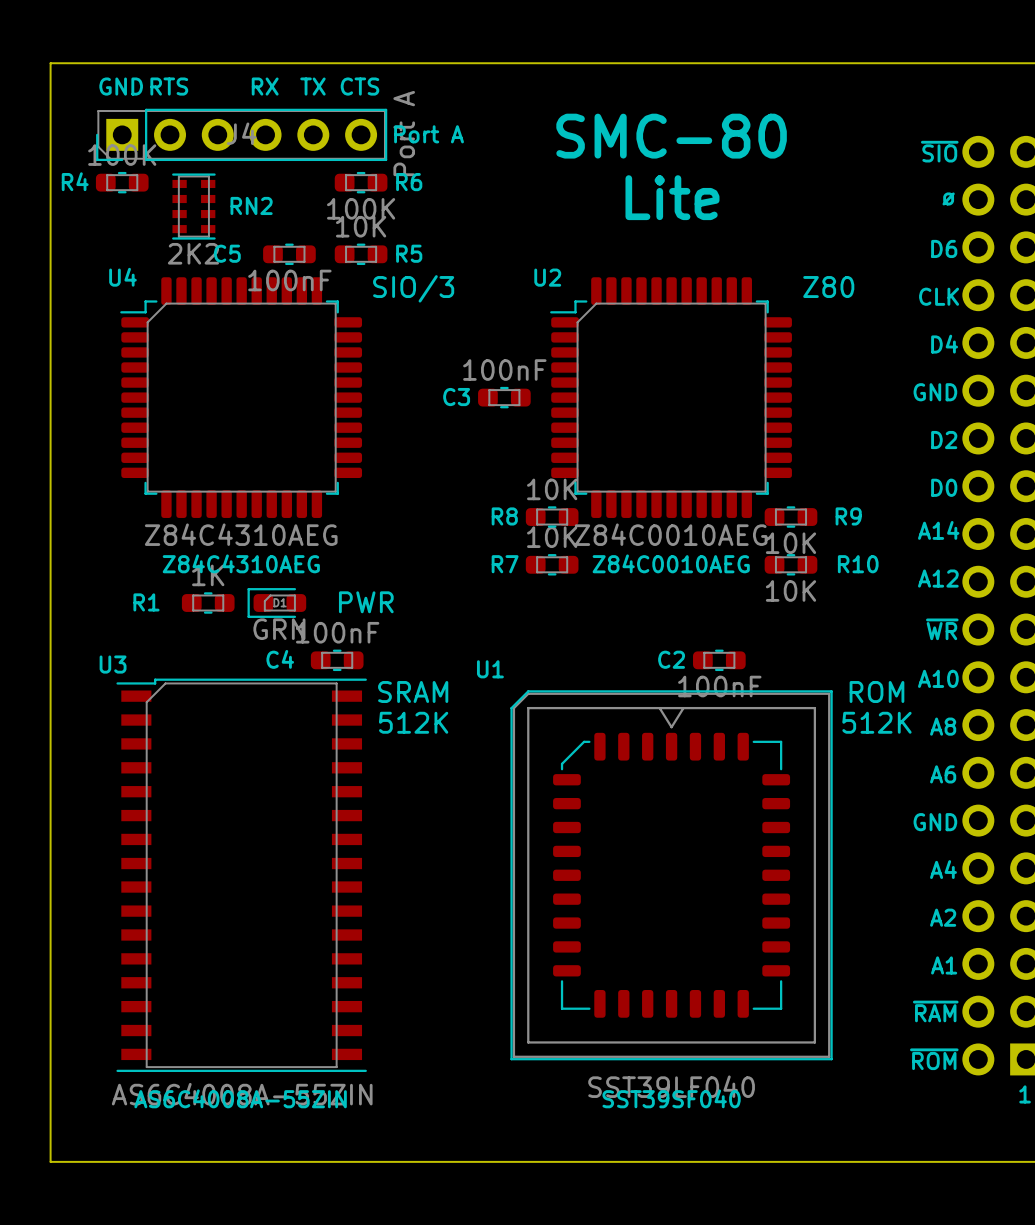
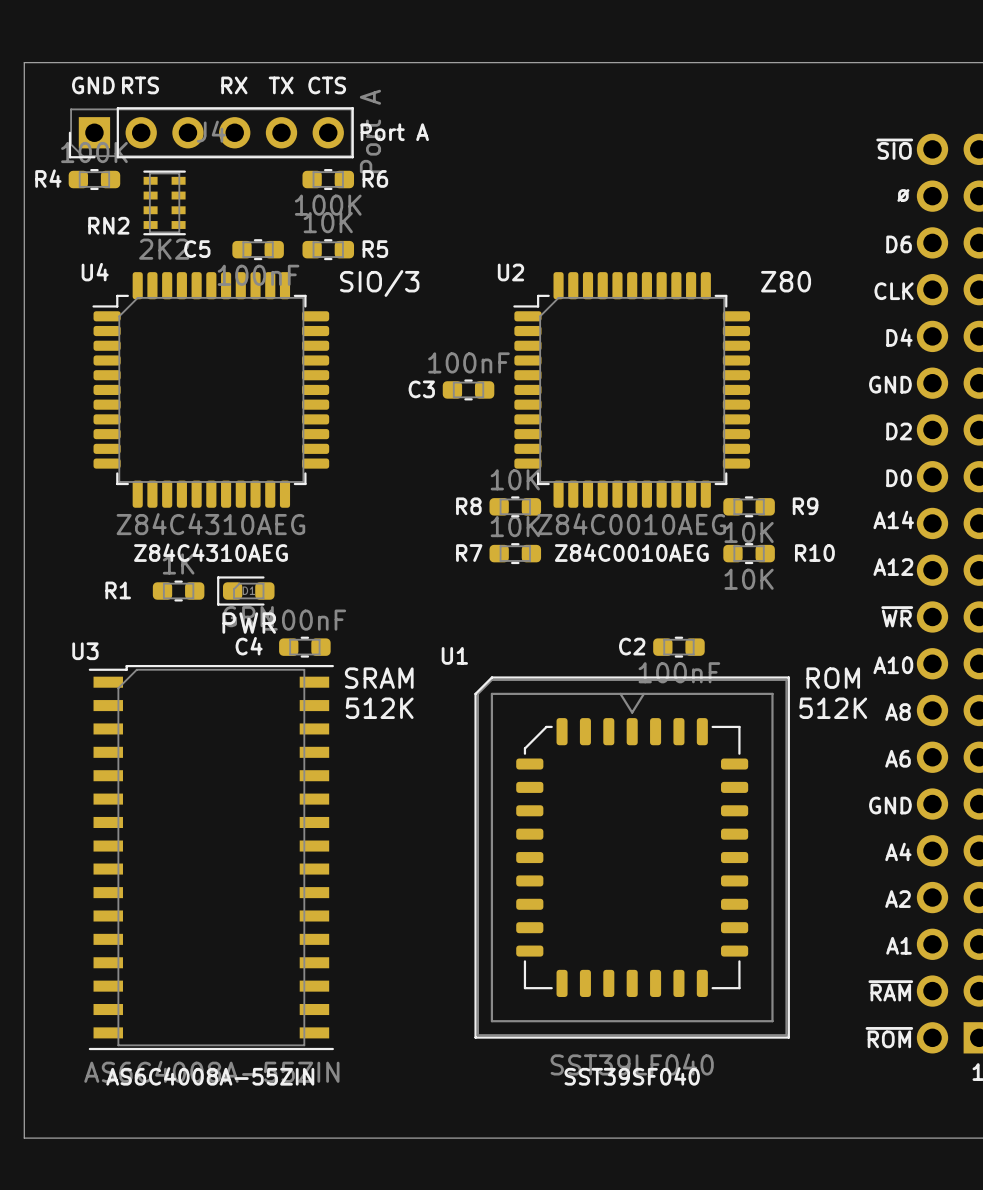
text: SMC-80 (671, 136) -> none
text: Lite (672, 197) -> none
RN2 name position: RN2 (251, 205) -> RN2 (108, 225)
text position: PWR (366, 602) -> PWR (249, 623)

